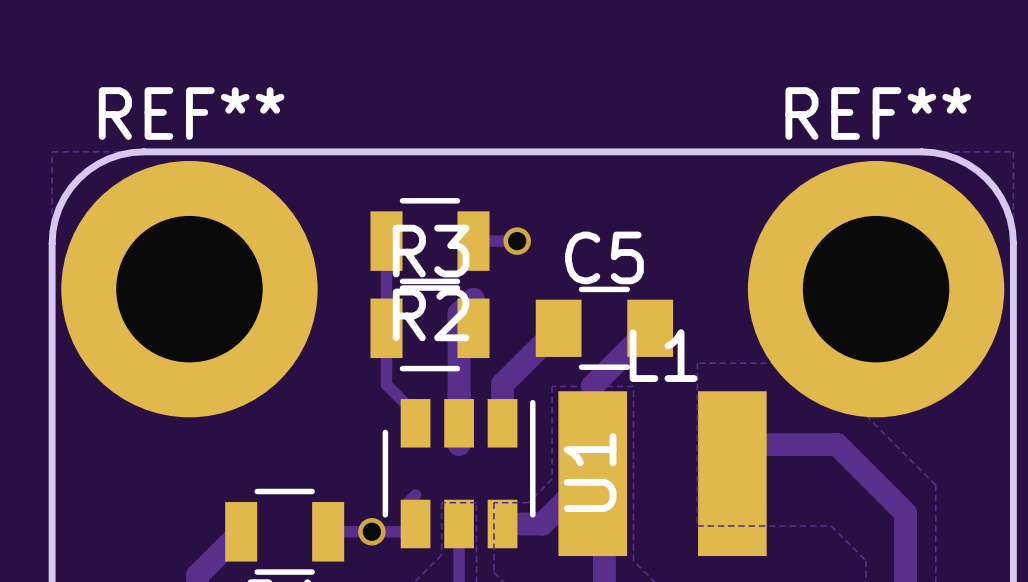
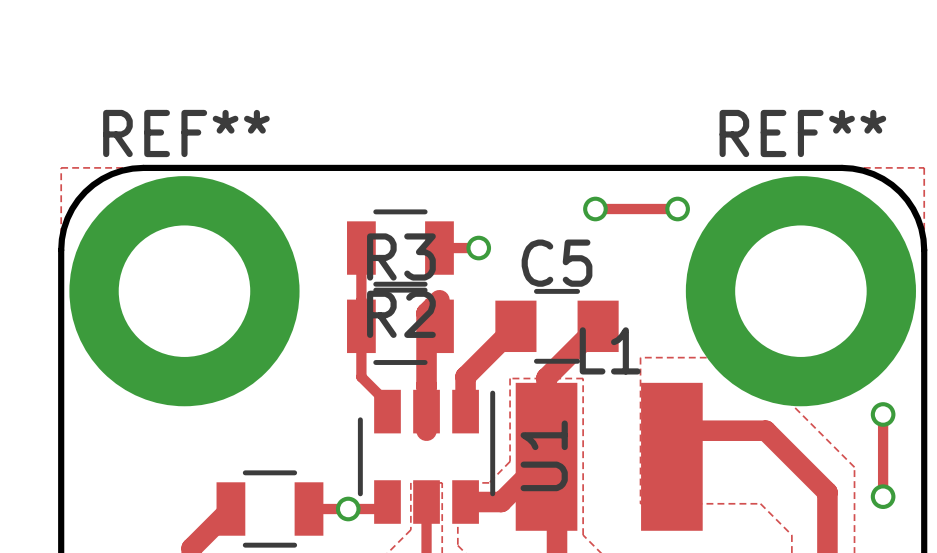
track: none -> (595, 209) (677, 209)
via: none -> (595, 209)
via: none -> (677, 209)
track: none -> (883, 414) (883, 496)
via: none -> (883, 414)
track: (415, 494) (407, 502) -> none
via: none -> (883, 496)

